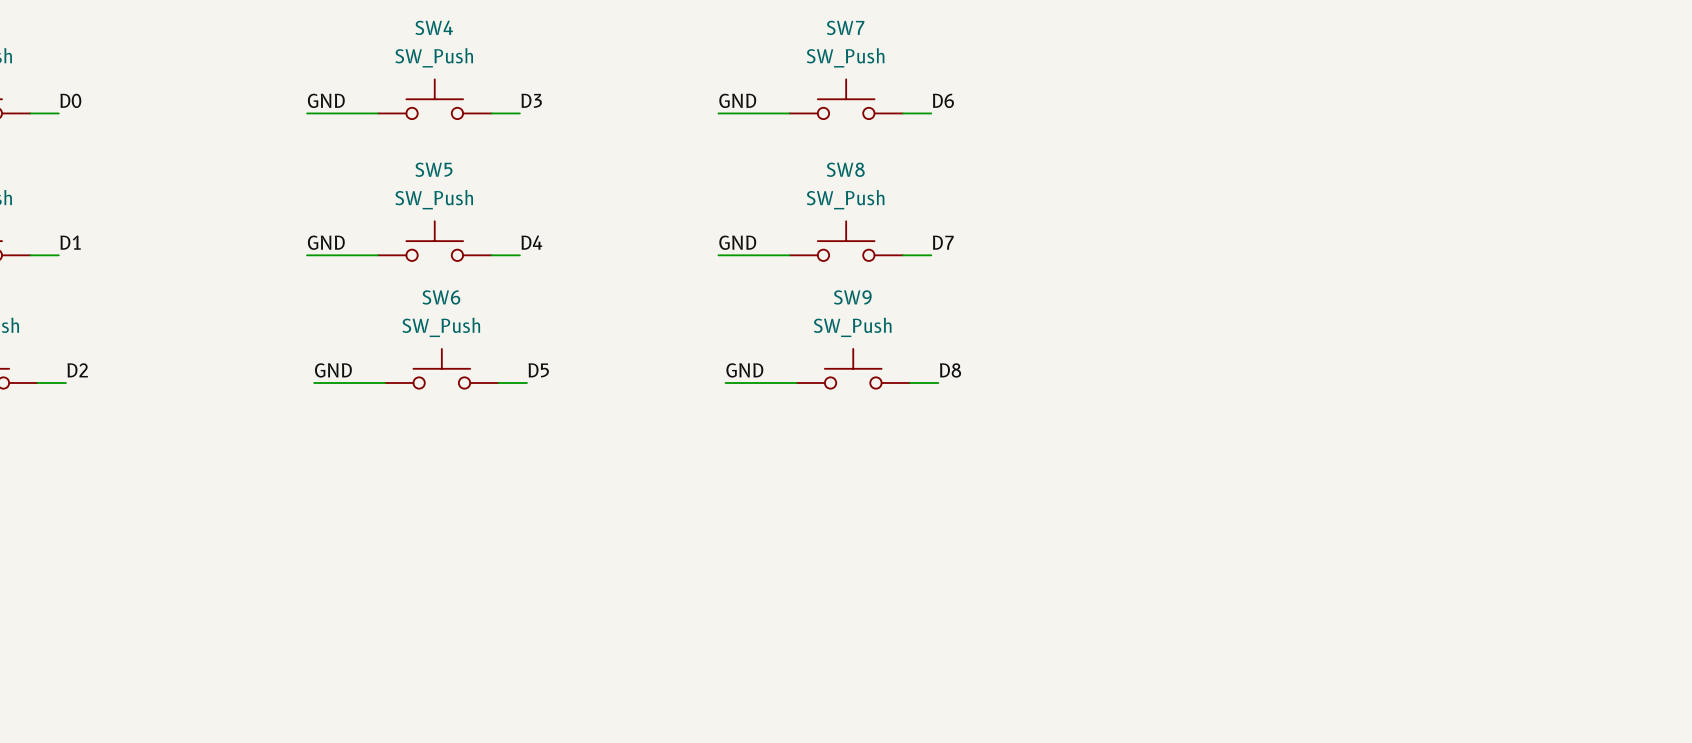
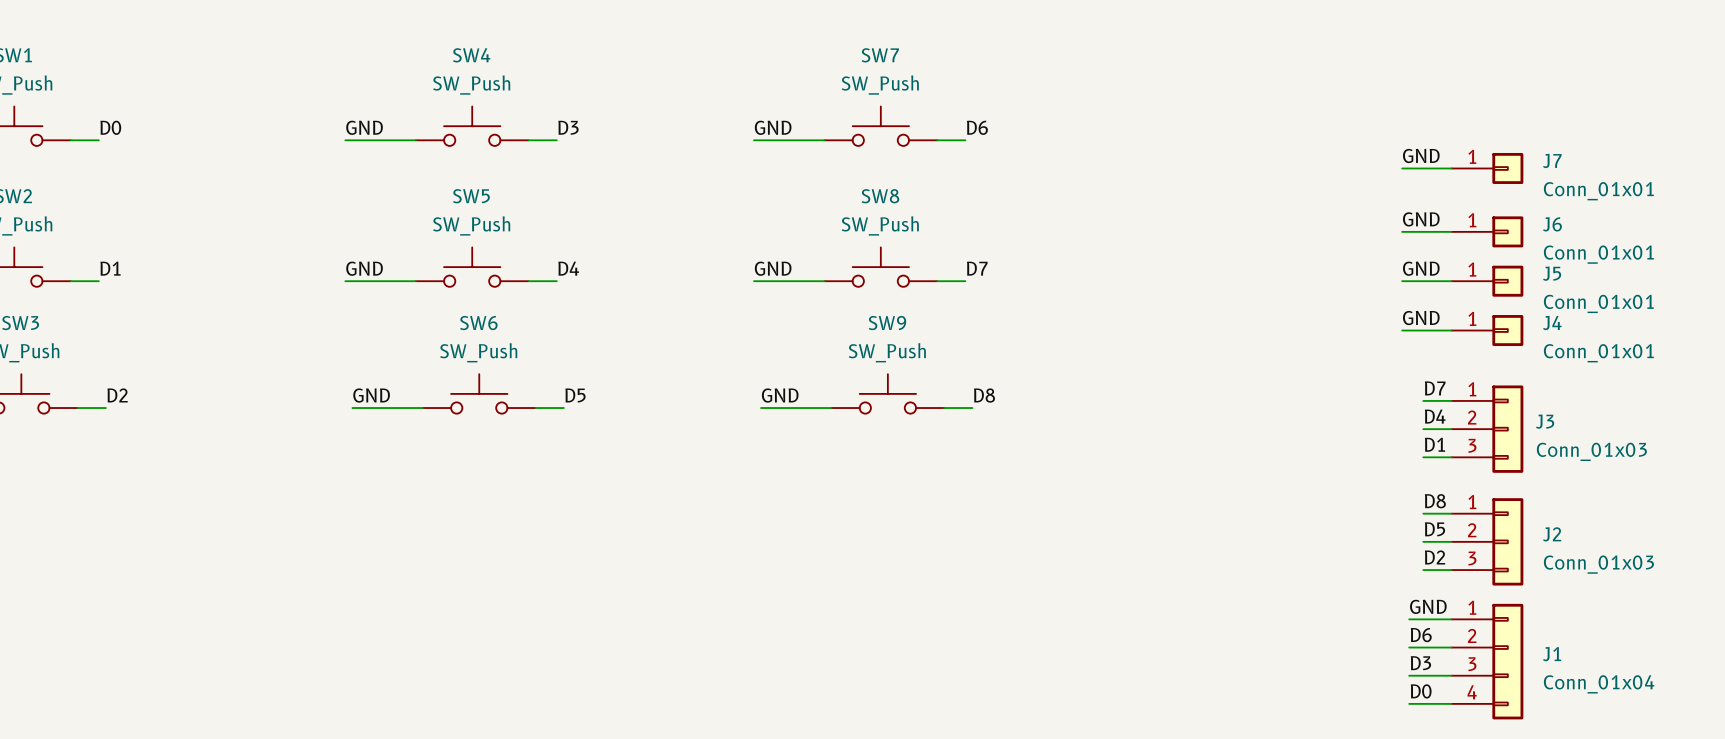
label: none -> GND (1421, 155)
wire: none -> (1402, 168) (1451, 168)
J7: none -> Conn_01x01 (1487, 168)
label: none -> GND (1421, 219)
wire: none -> (1402, 231) (1451, 231)
J6: none -> Conn_01x01 (1487, 231)
label: none -> GND (1421, 268)
wire: none -> (1402, 281) (1451, 281)
J5: none -> Conn_01x01 (1487, 281)
label: none -> GND (1421, 318)
wire: none -> (1402, 330) (1451, 330)
J4: none -> Conn_01x01 (1487, 330)
label: none -> D7 (1435, 388)
wire: none -> (1423, 400) (1451, 400)
label: none -> D4 (1435, 416)
wire: none -> (1423, 429) (1451, 429)
J3: none -> Conn_01x03 (1487, 429)
label: none -> D1 (1434, 444)
wire: none -> (1423, 457) (1451, 457)
label: none -> D8 (1435, 501)
wire: none -> (1423, 513) (1451, 513)
label: none -> D5 (1434, 529)
wire: none -> (1423, 541) (1451, 541)
J2: none -> Conn_01x03 (1487, 541)
label: none -> D2 (1435, 557)
wire: none -> (1423, 570) (1451, 570)
label: none -> GND (1428, 606)
wire: none -> (1409, 619) (1451, 619)
label: none -> D6 (1421, 635)
wire: none -> (1409, 647) (1451, 647)
J1: none -> Conn_01x04 (1487, 661)
label: none -> D3 (1420, 663)
wire: none -> (1409, 675) (1451, 675)
label: none -> D0 (1421, 691)
wire: none -> (1409, 703) (1451, 703)

